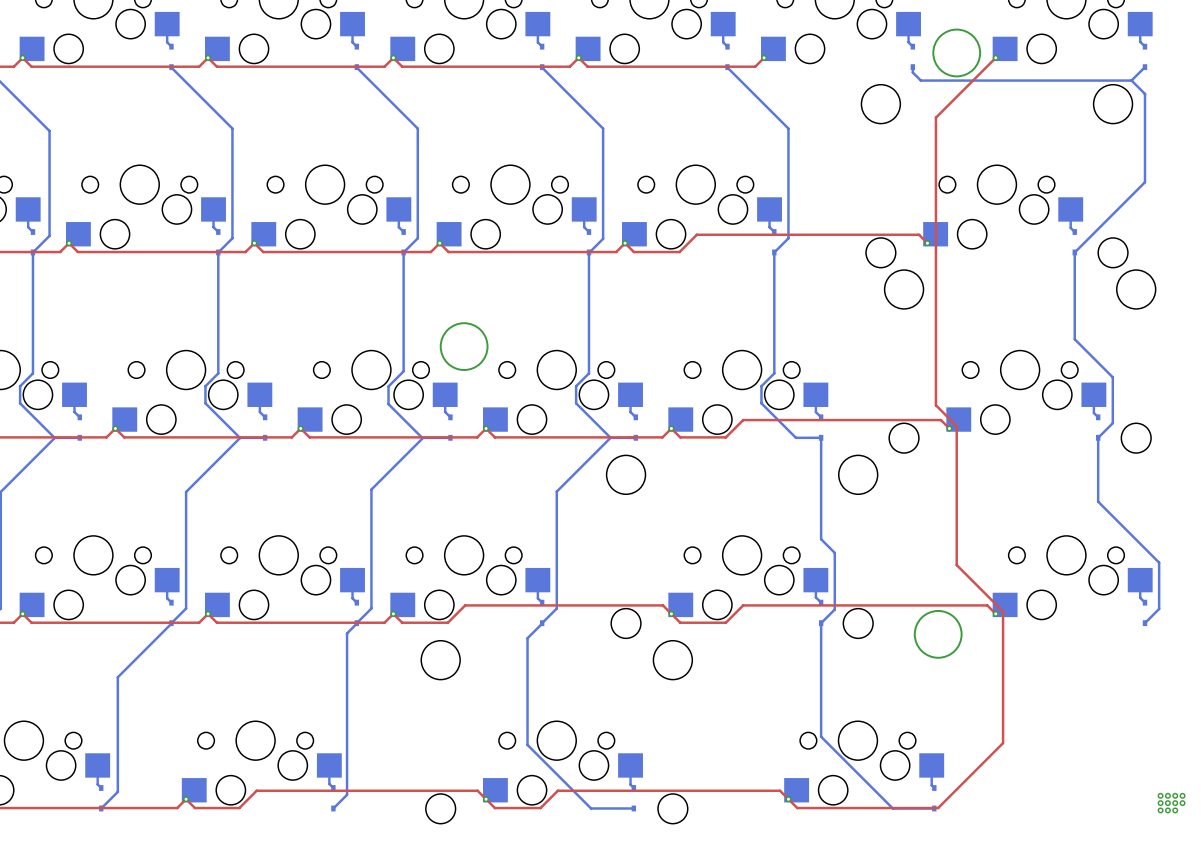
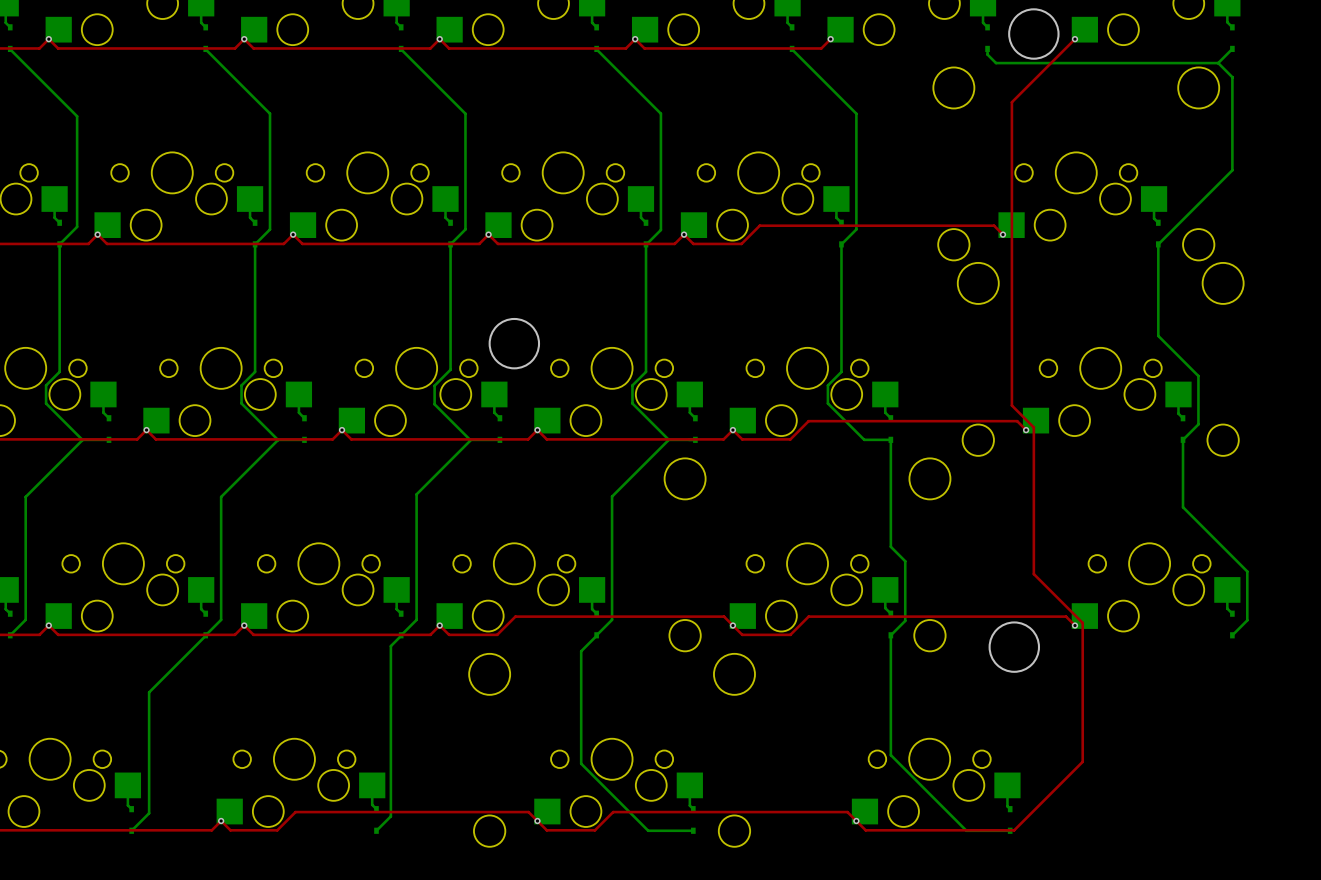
via: (1160, 795) -> none
via: (1167, 795) -> none
via: (1175, 795) -> none
via: (1182, 795) -> none
via: (1160, 803) -> none
via: (1167, 803) -> none
via: (1175, 803) -> none
via: (1182, 803) -> none
via: (1160, 810) -> none
via: (1167, 810) -> none
via: (1175, 810) -> none

